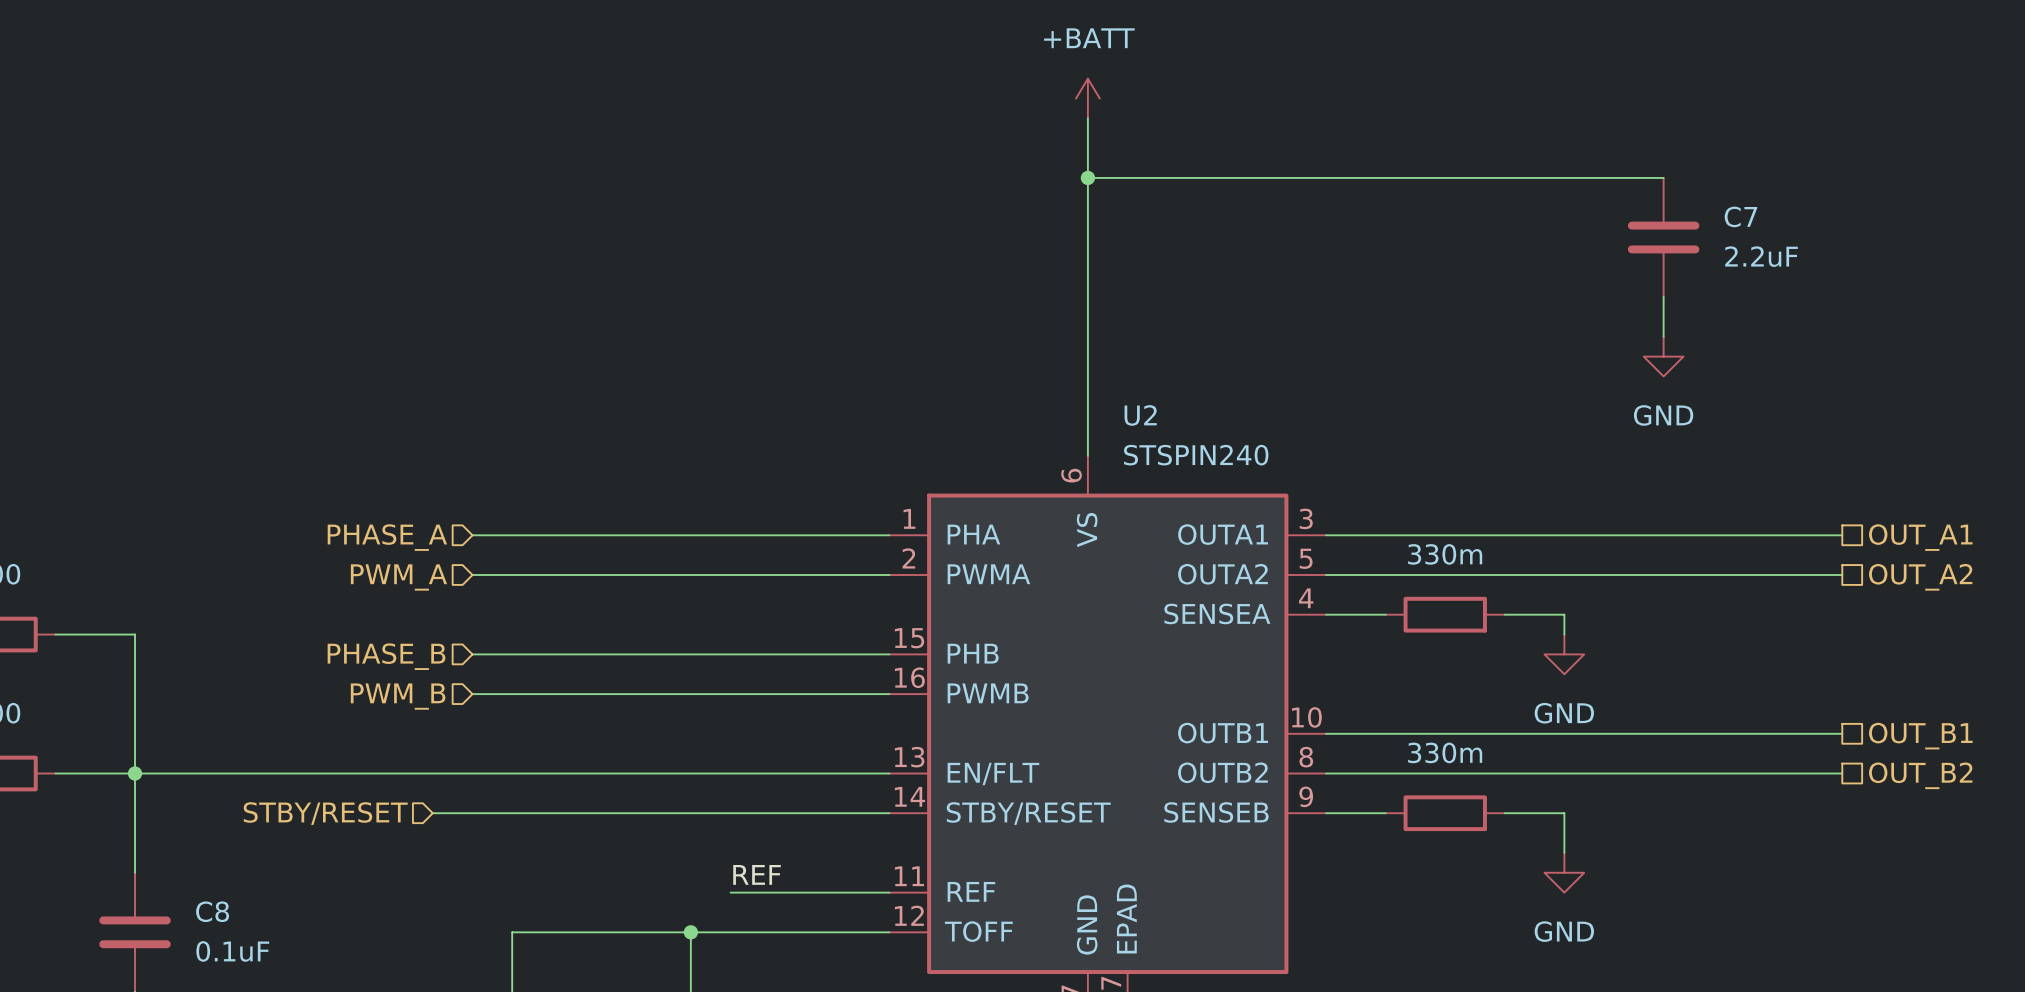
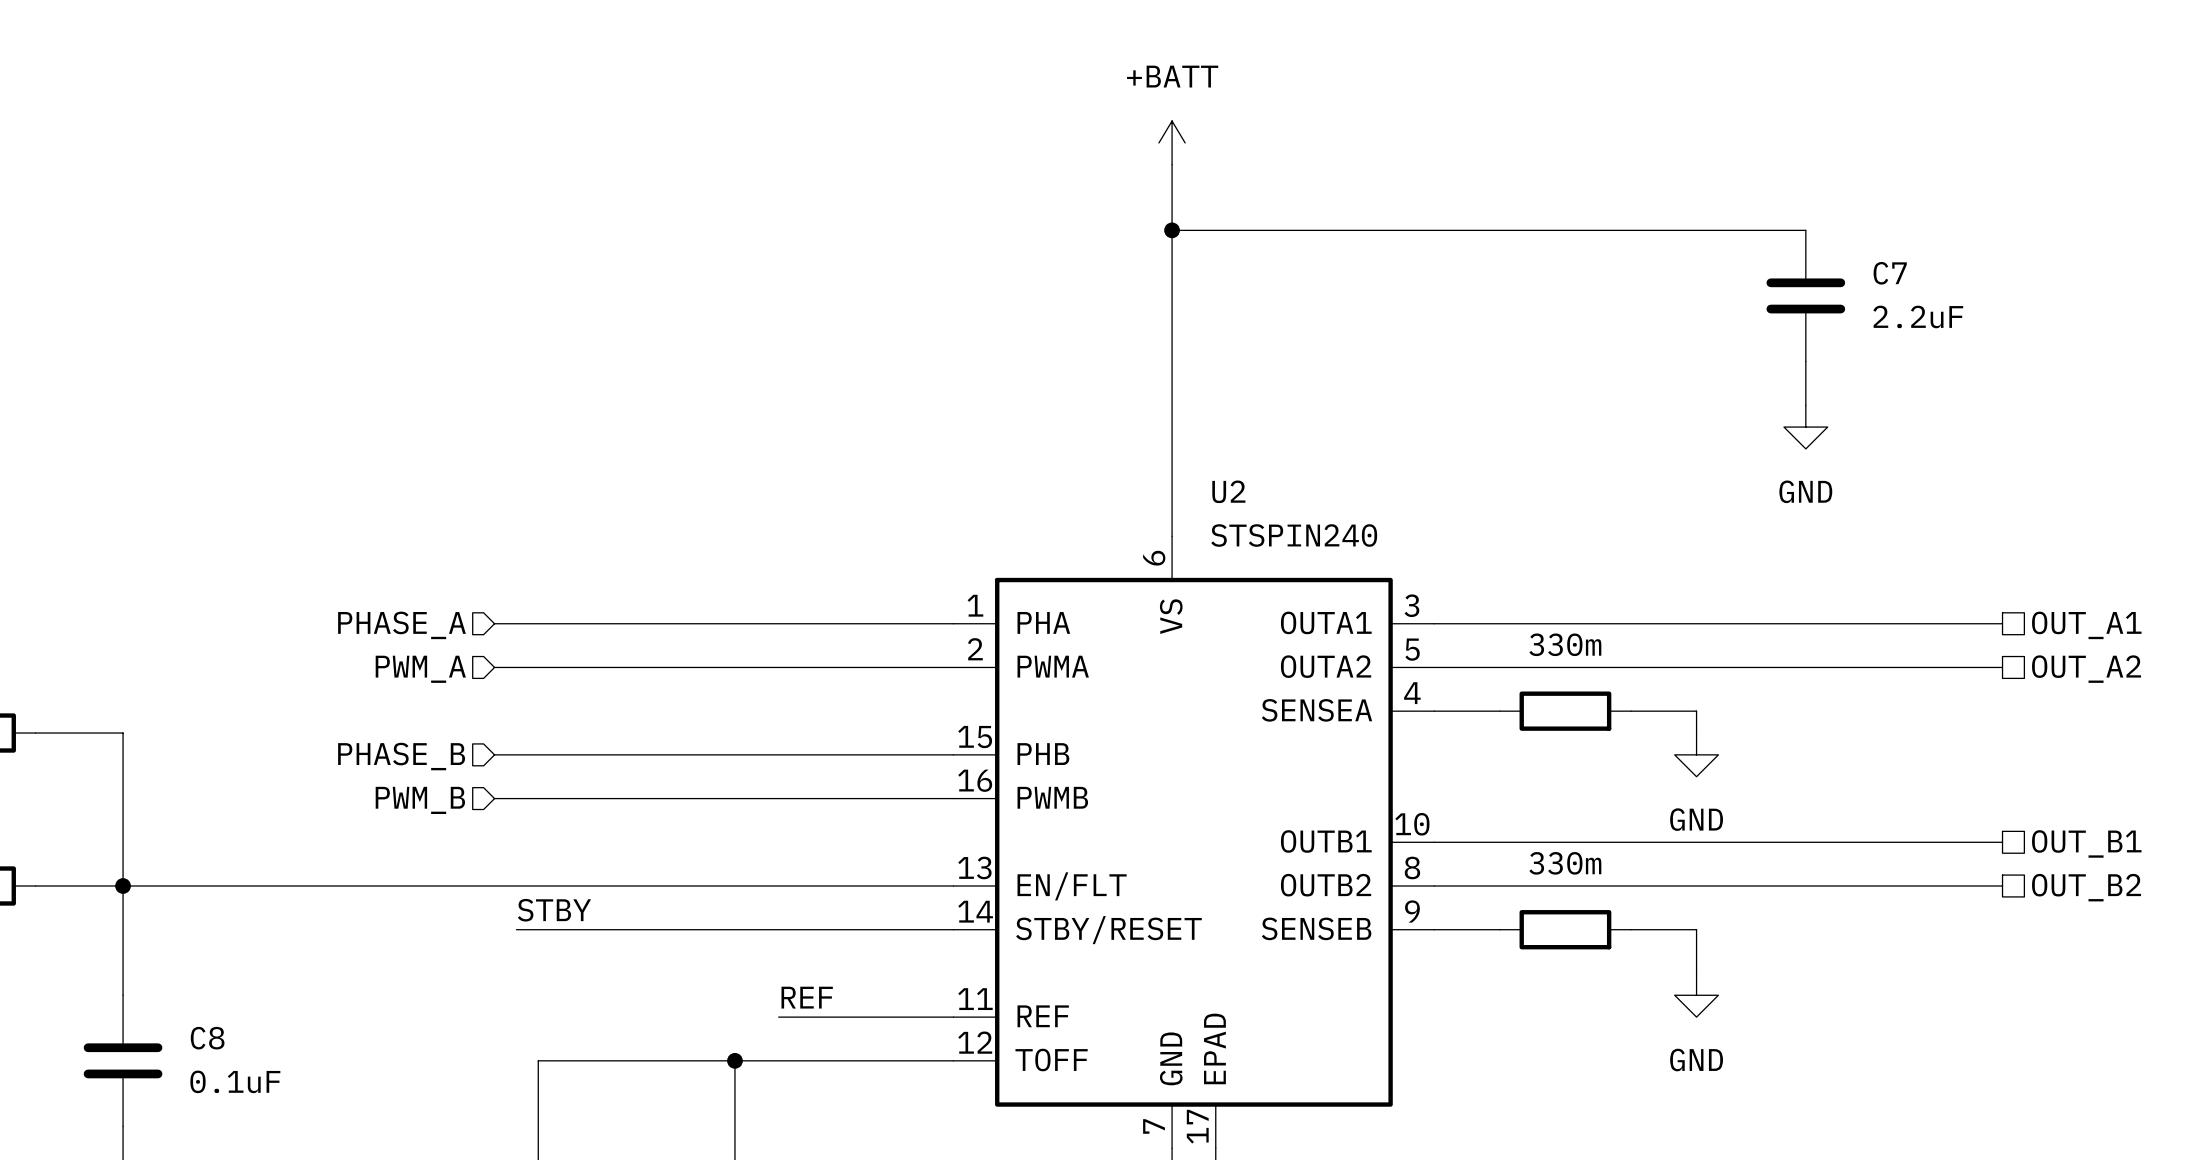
label: none -> STBY (554, 910)
hierarchical label: STBY/RESET (325, 813) -> none
wire: (432, 813) (492, 813) -> none

